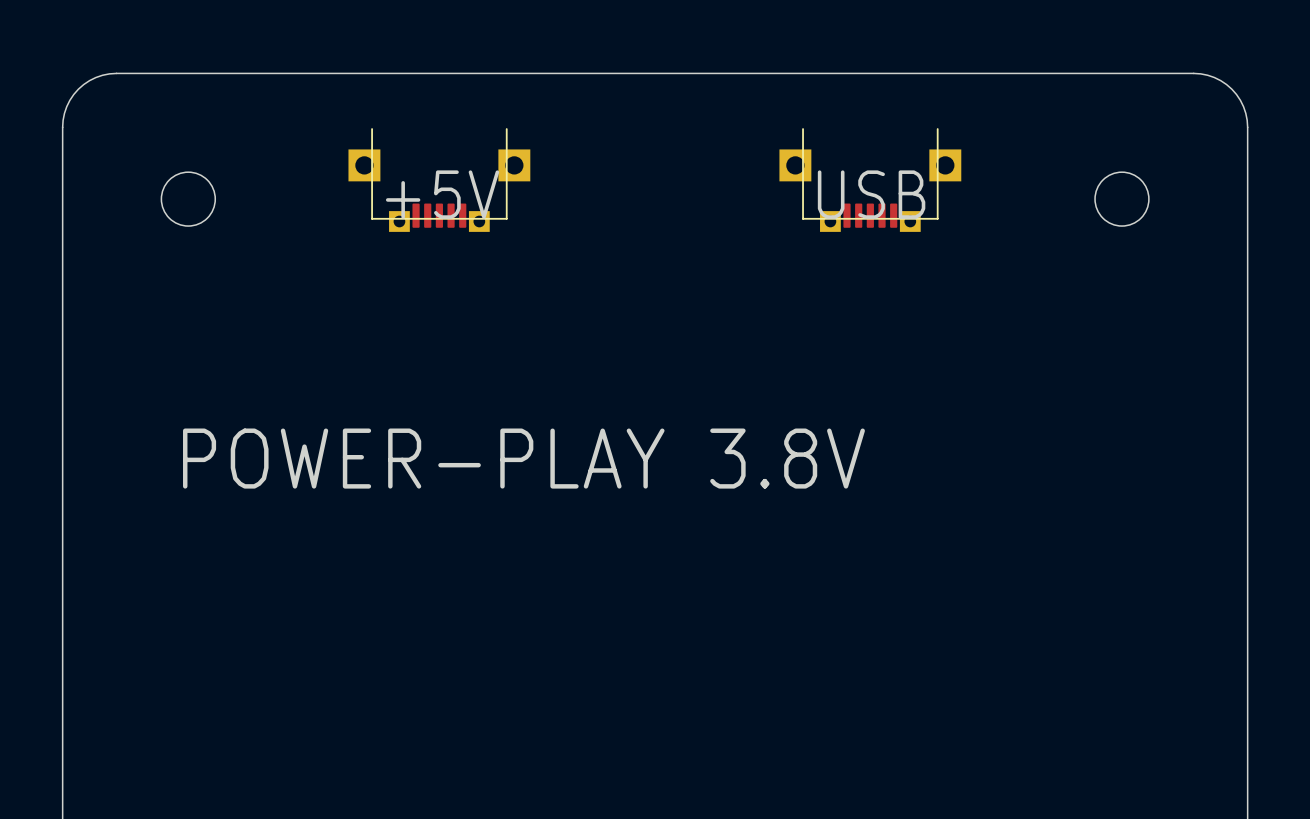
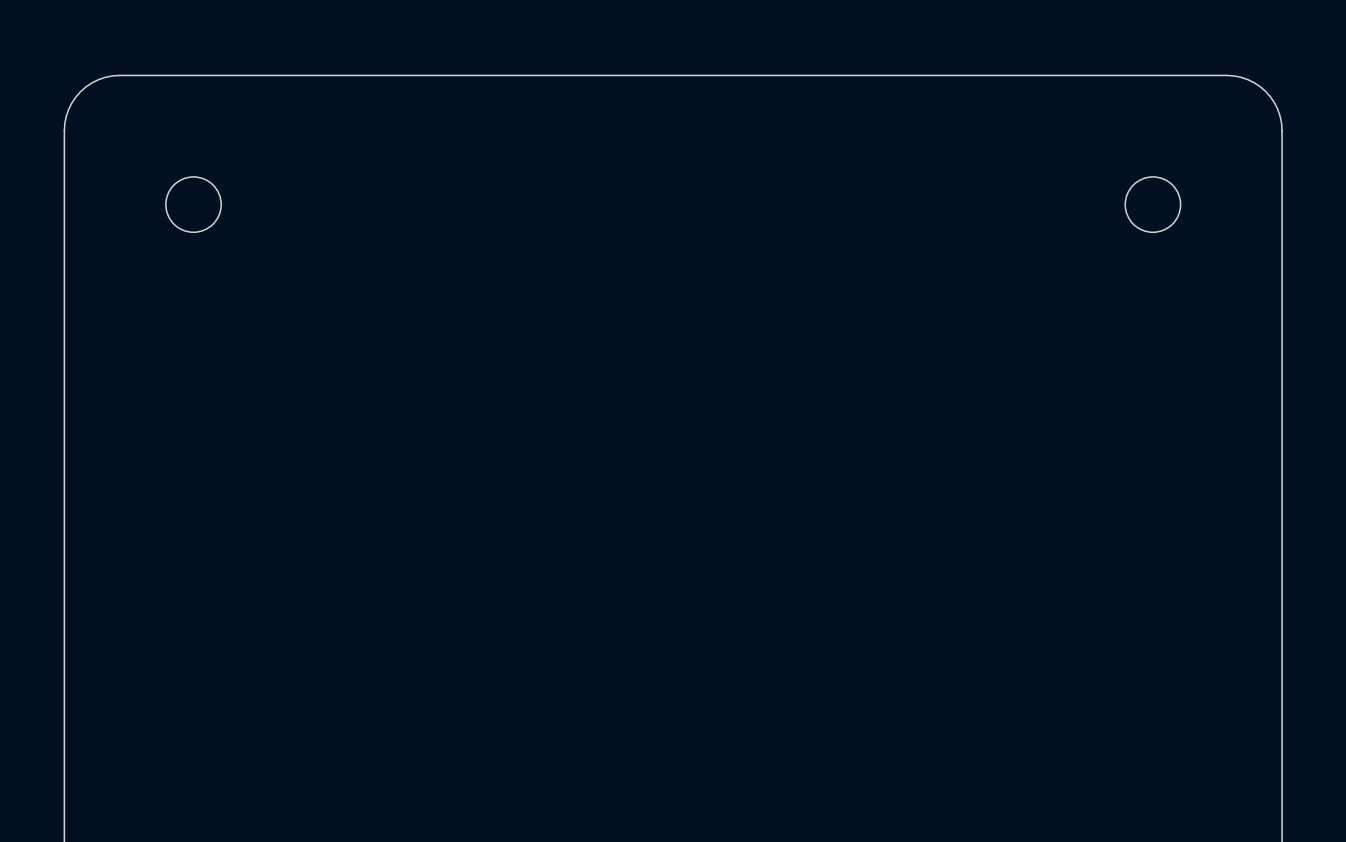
part: (439, 180) -> none
part: (870, 180) -> none
text: +5V (442, 194) -> none
text: USB (871, 194) -> none
text: POWER-PLAY 3.8V (523, 458) -> none

